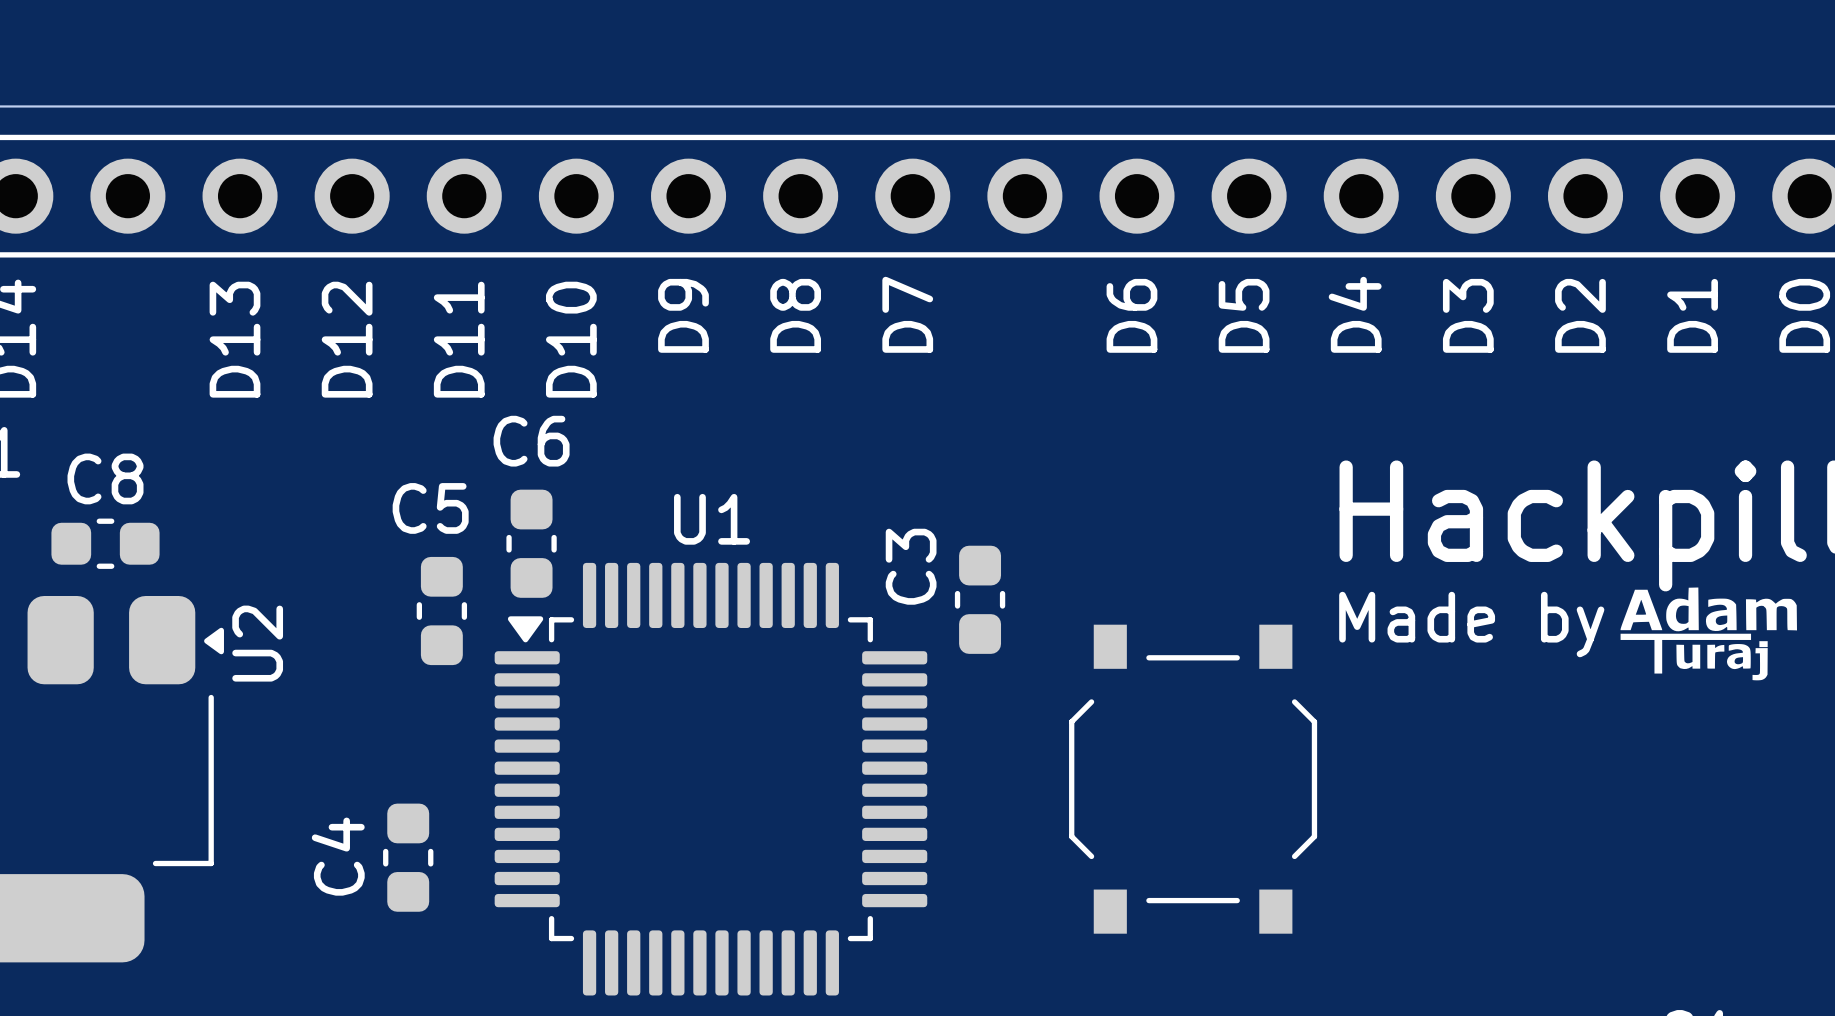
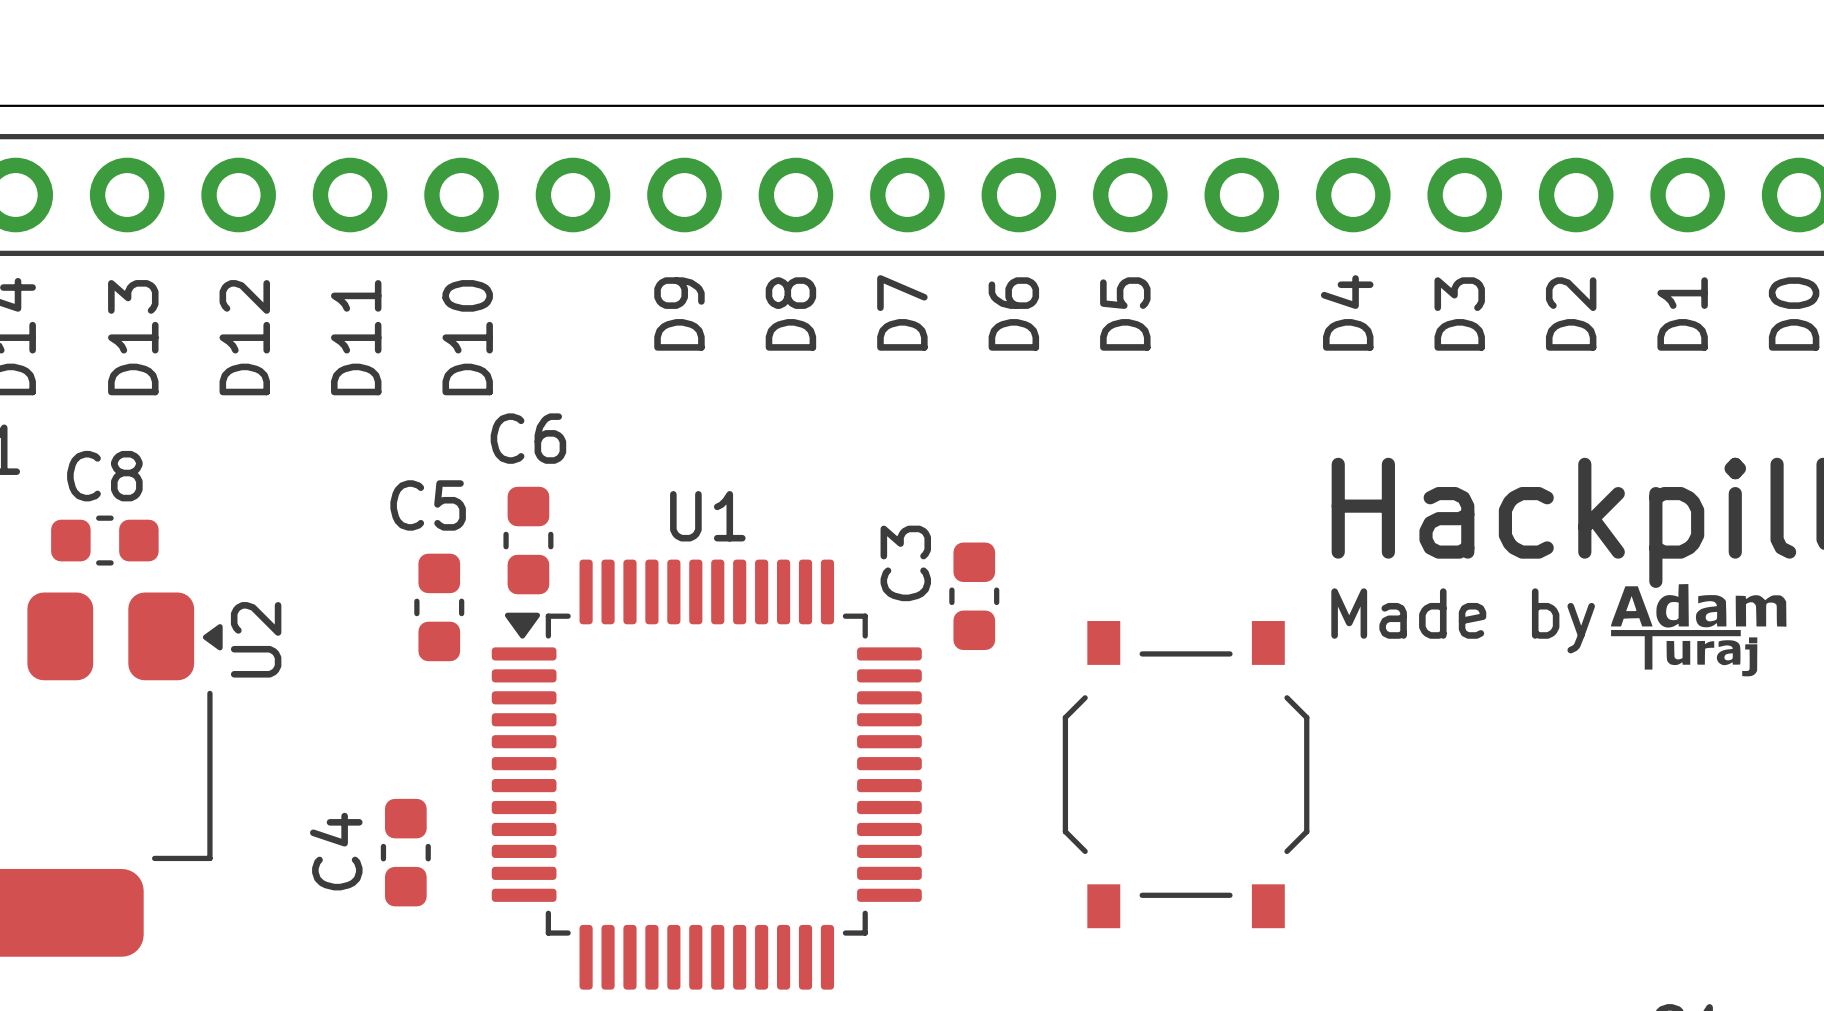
text: none -> D6 (1013, 313)
text: D6 (1131, 315) -> D5 (1125, 313)
text: D5 (1244, 315) -> none
text: none -> D13 (133, 337)
text: D13 (235, 339) -> D12 (244, 337)
text: D12 (347, 339) -> D11 (356, 337)
text: D11 (459, 339) -> D10 (467, 337)
text: D10 (571, 339) -> none

